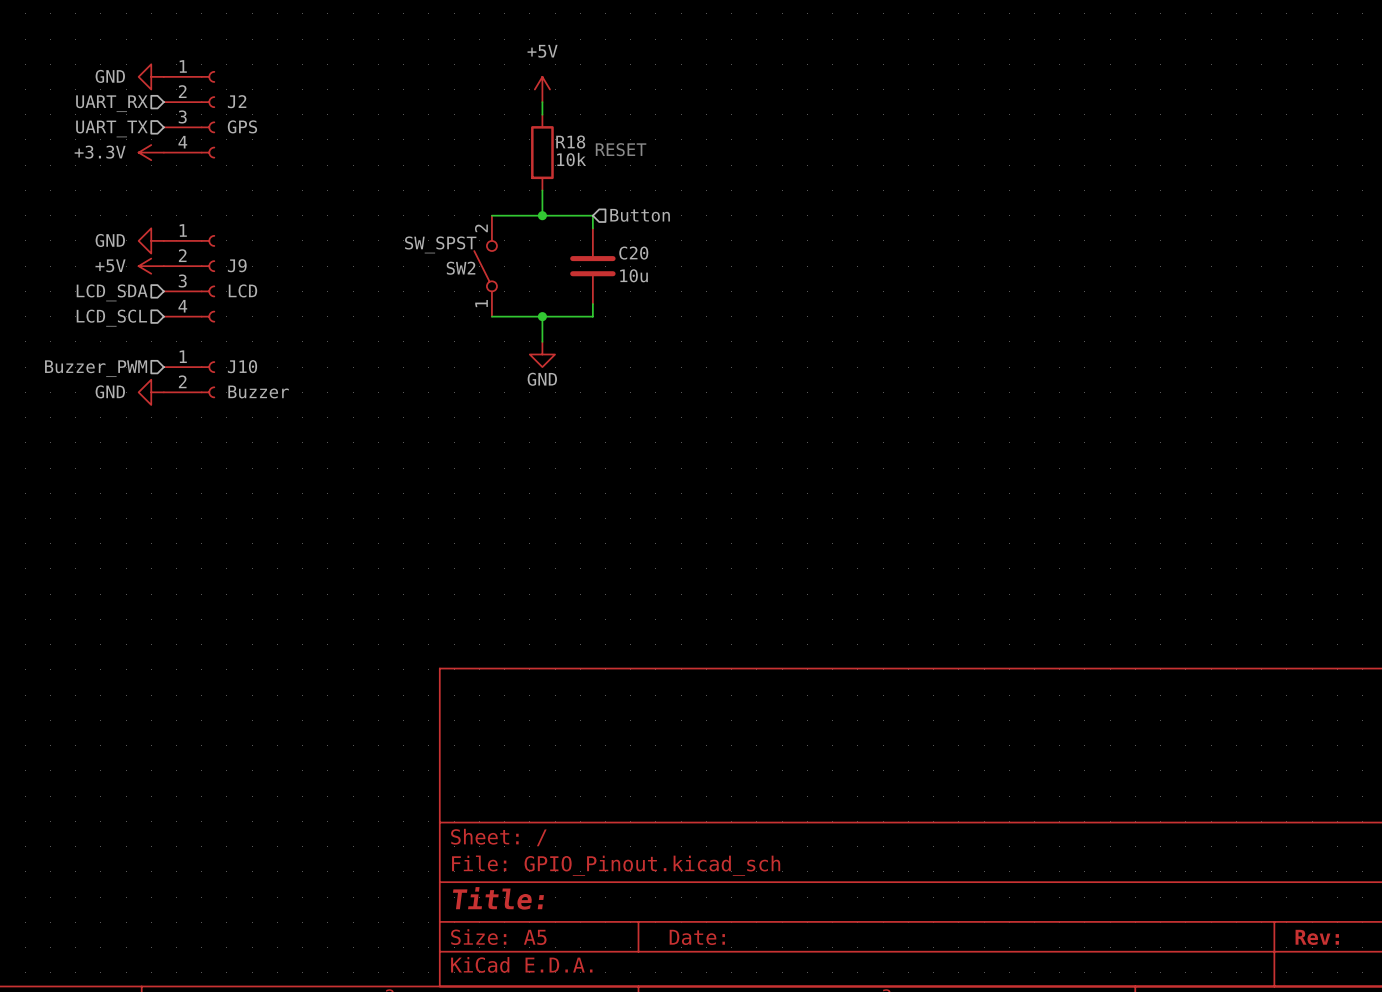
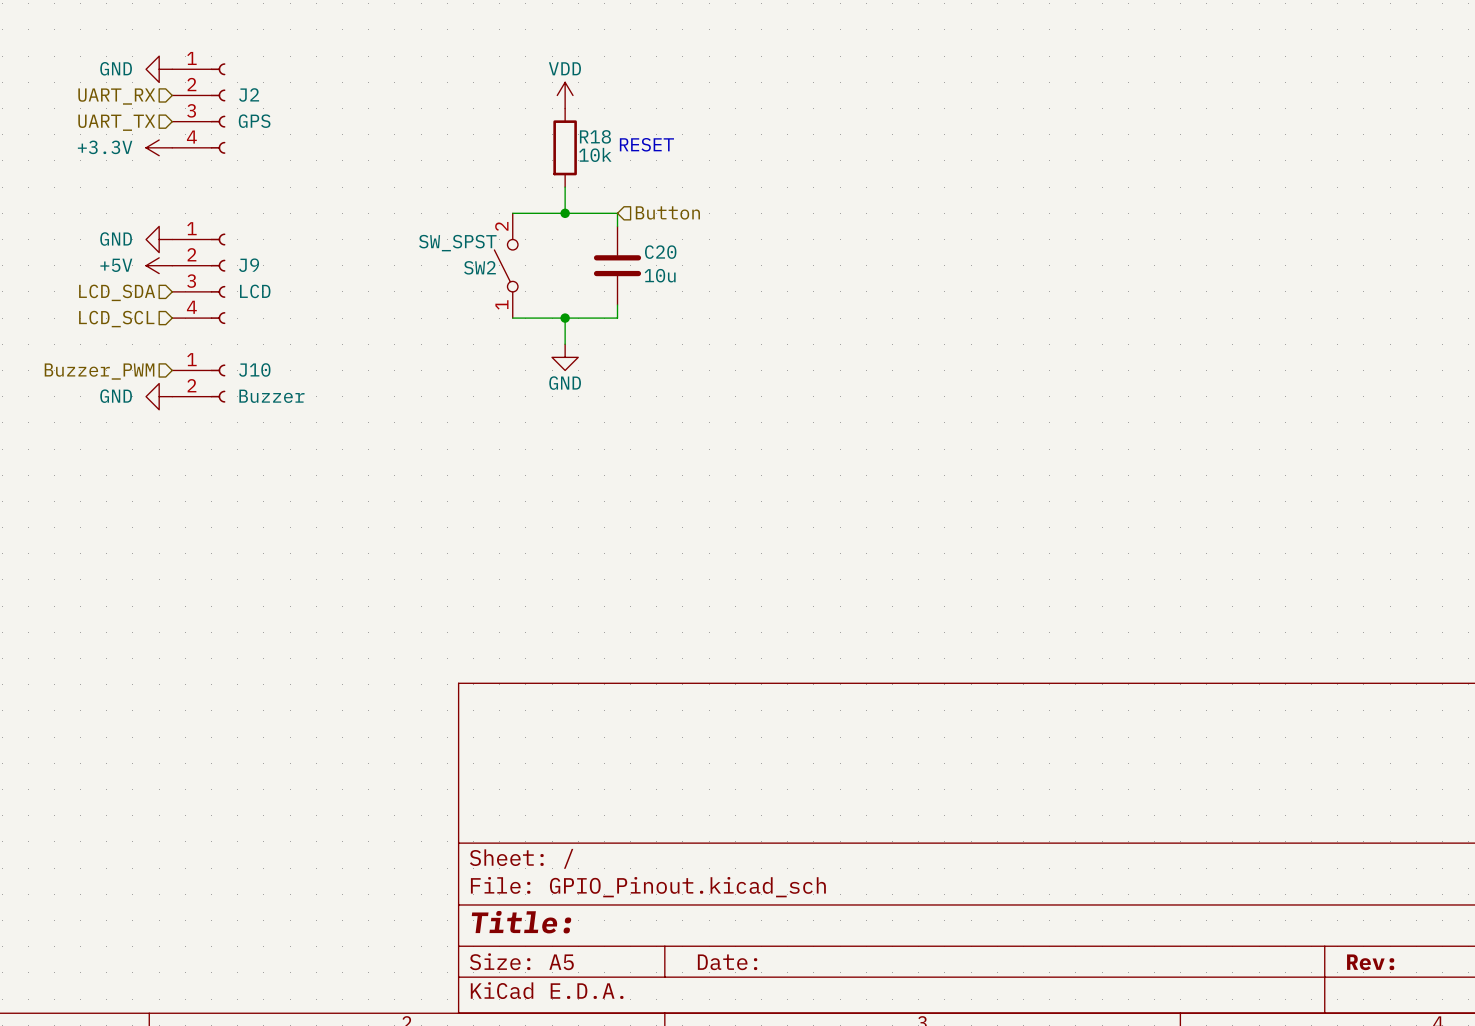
power symbol: +5V (542, 89) -> none
power symbol: none -> VDD (565, 95)

